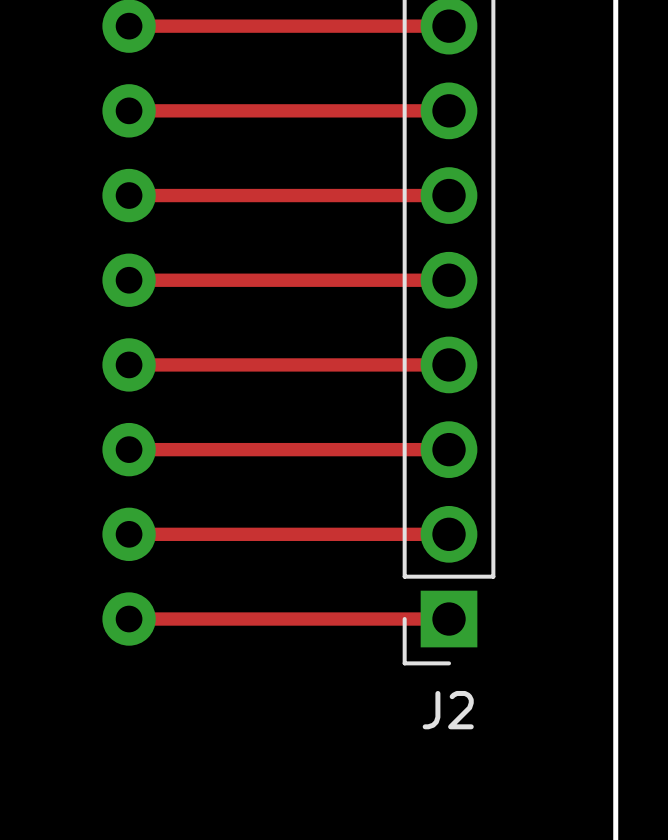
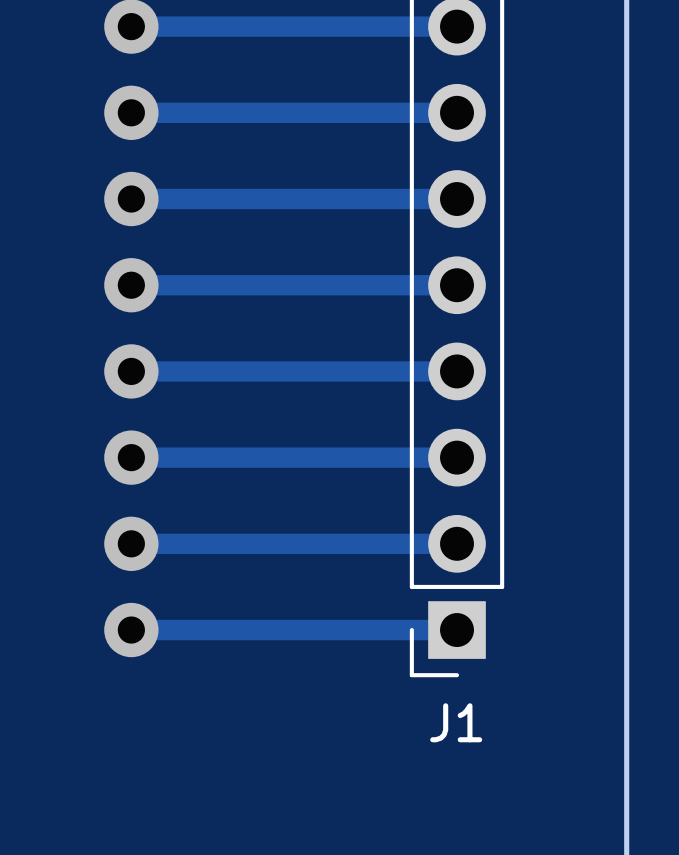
track width: thin (129, 26) (449, 26) -> thick (131, 26) (457, 26)
track width: thin (129, 110) (449, 110) -> thick (131, 112) (457, 112)
track width: thin (129, 195) (449, 195) -> thick (131, 199) (457, 199)
track width: thin (129, 280) (449, 280) -> thick (131, 285) (457, 285)
track width: thin (129, 364) (449, 364) -> thick (131, 371) (457, 371)
track width: thin (129, 449) (449, 449) -> thick (131, 457) (457, 457)
track width: thin (129, 534) (449, 534) -> thick (131, 543) (457, 543)
track width: thin (129, 619) (449, 619) -> thick (131, 630) (457, 630)
J2 name: J2 (448, 710) -> J1 (456, 722)

